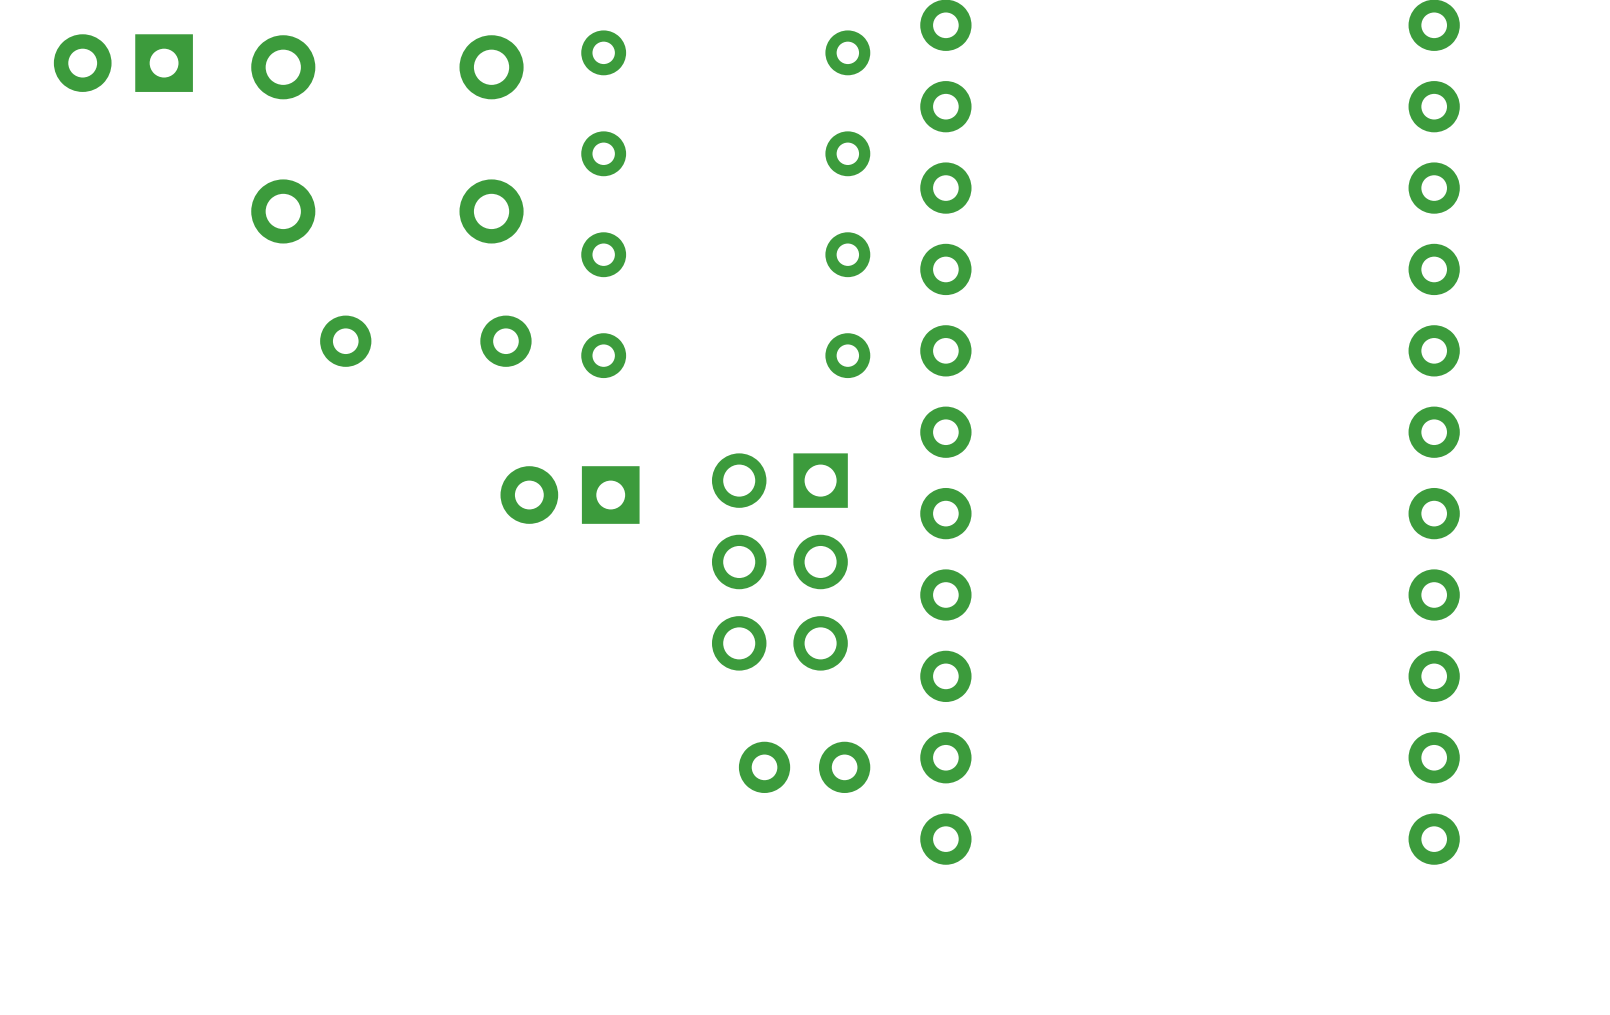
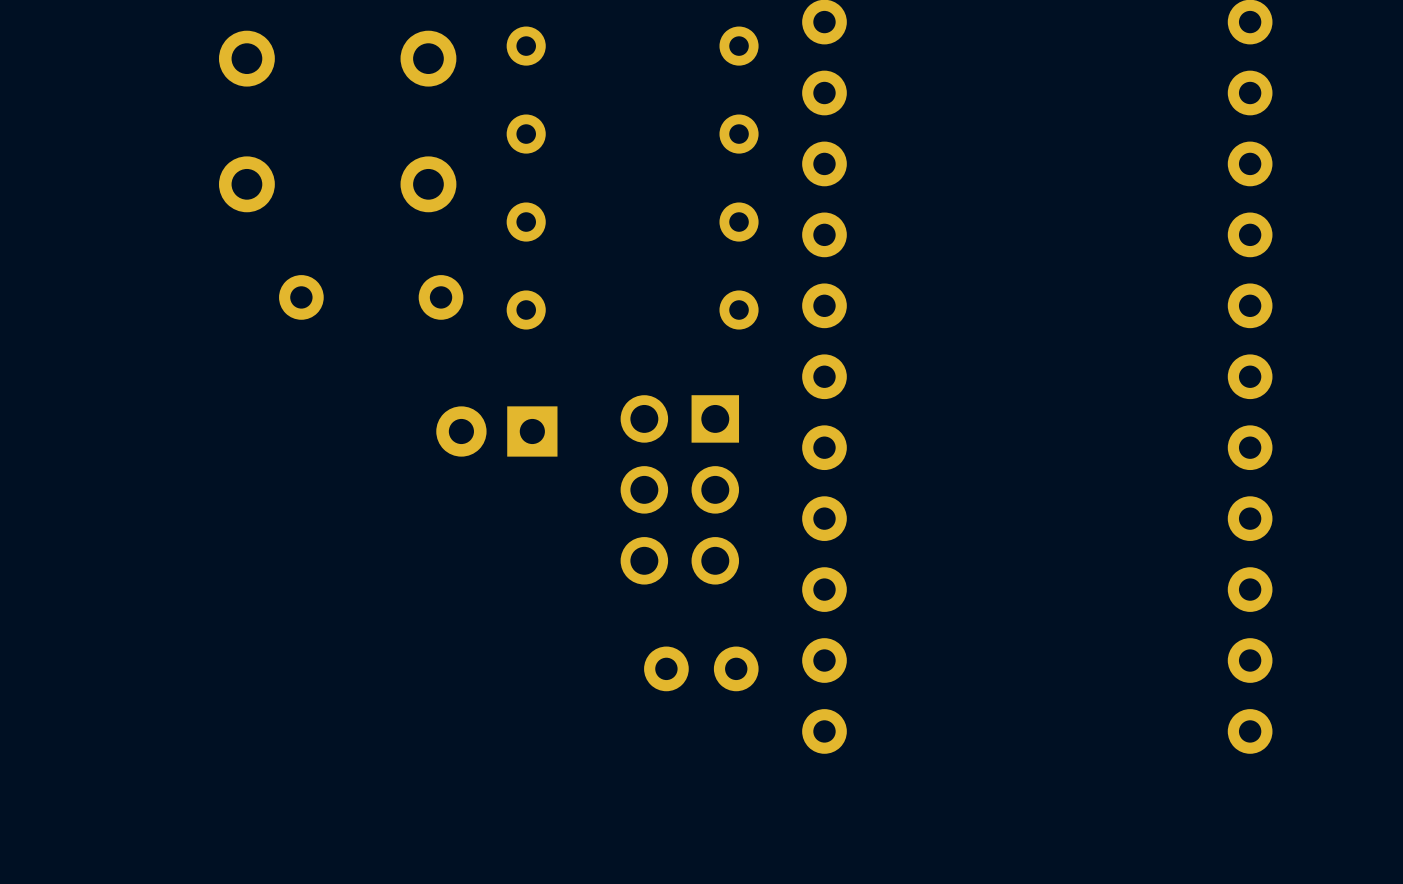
part: (123, 63) -> none

